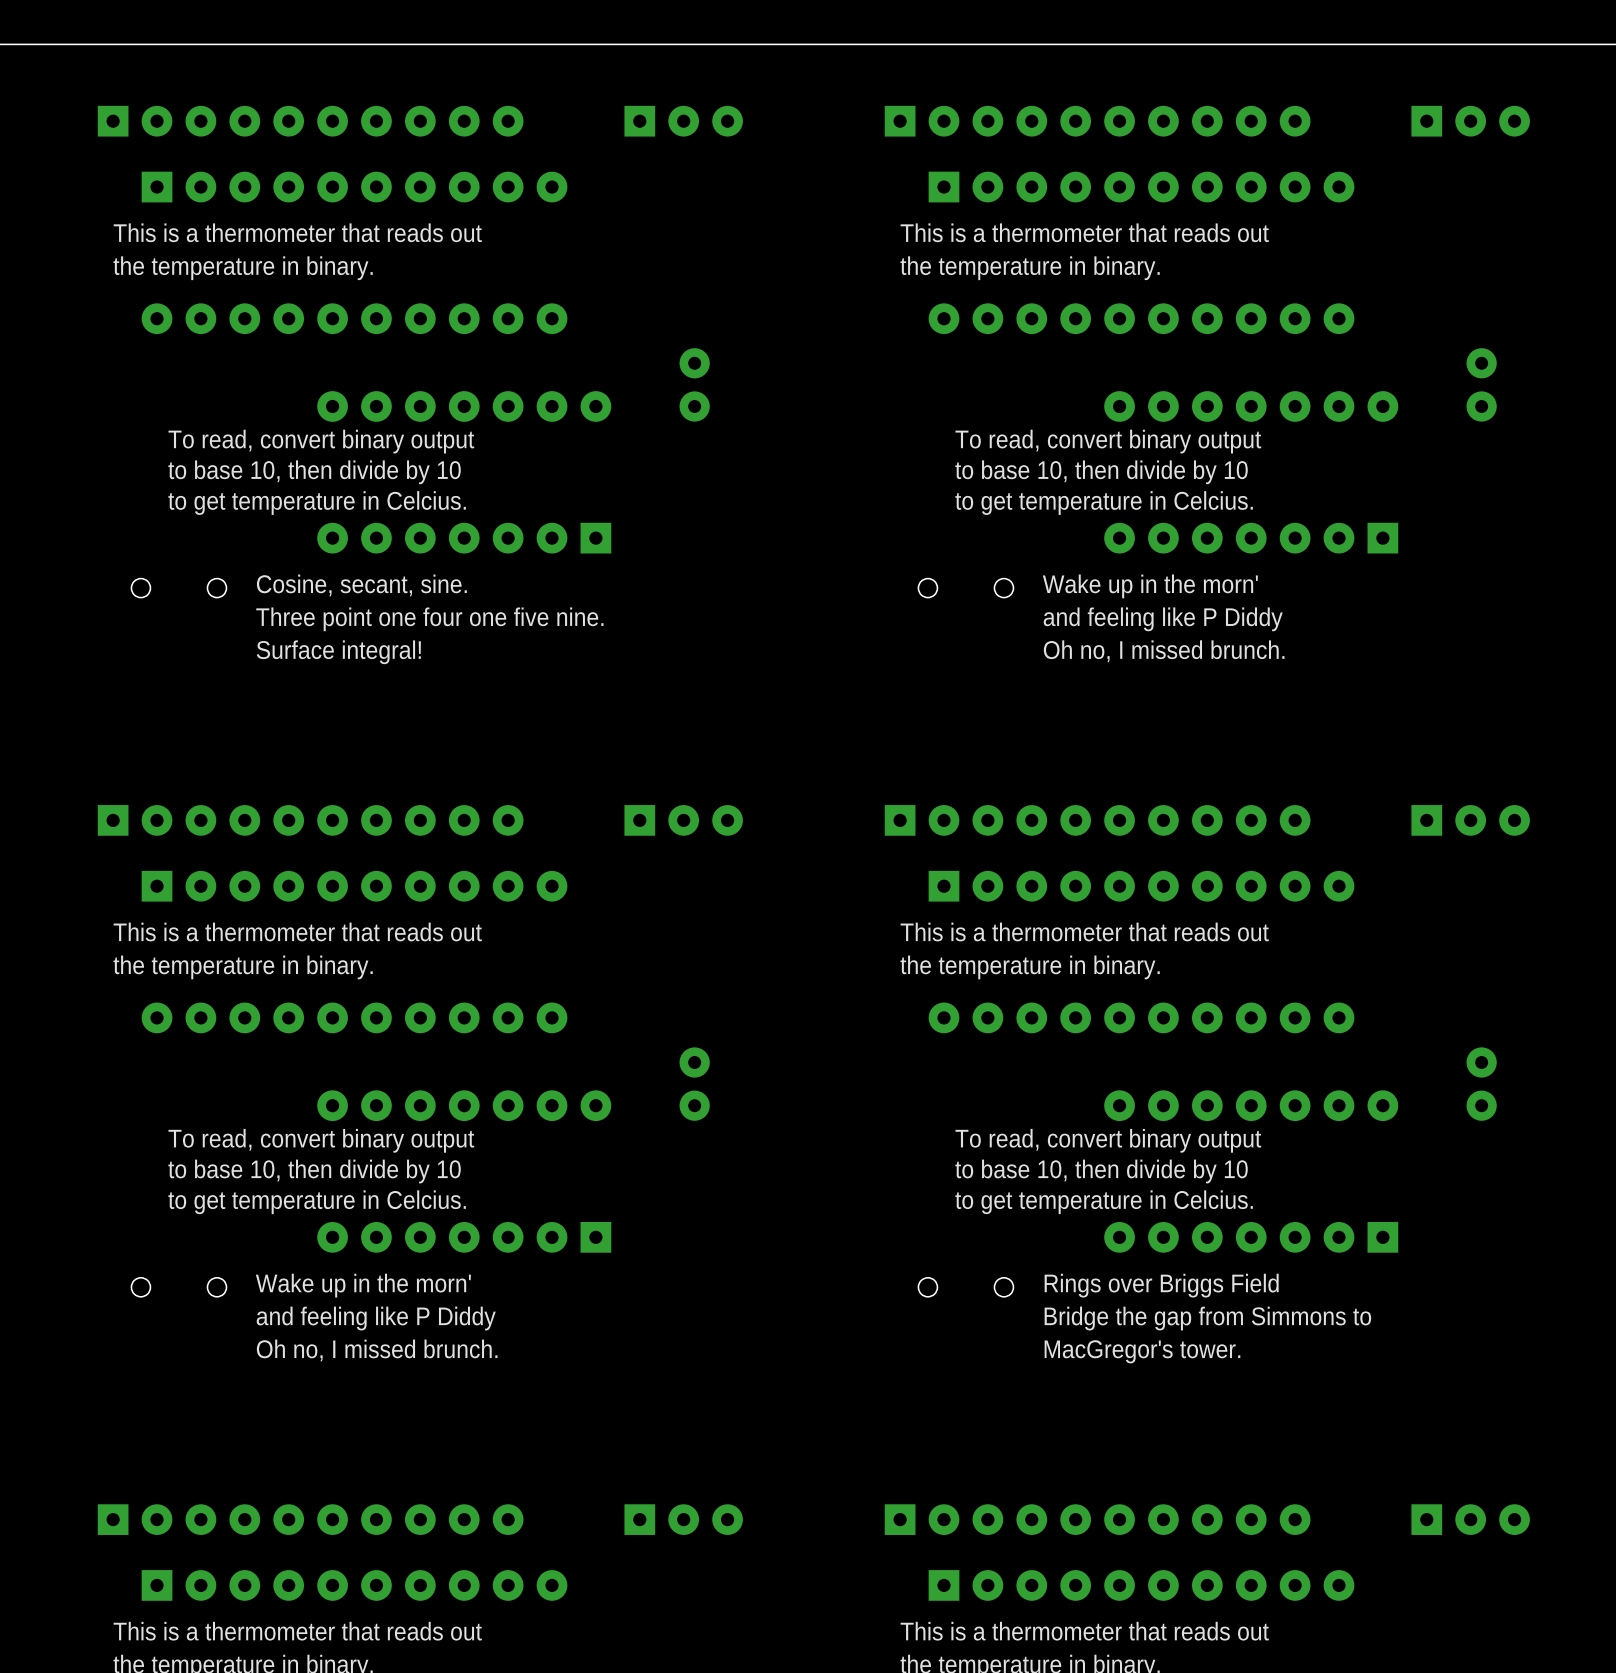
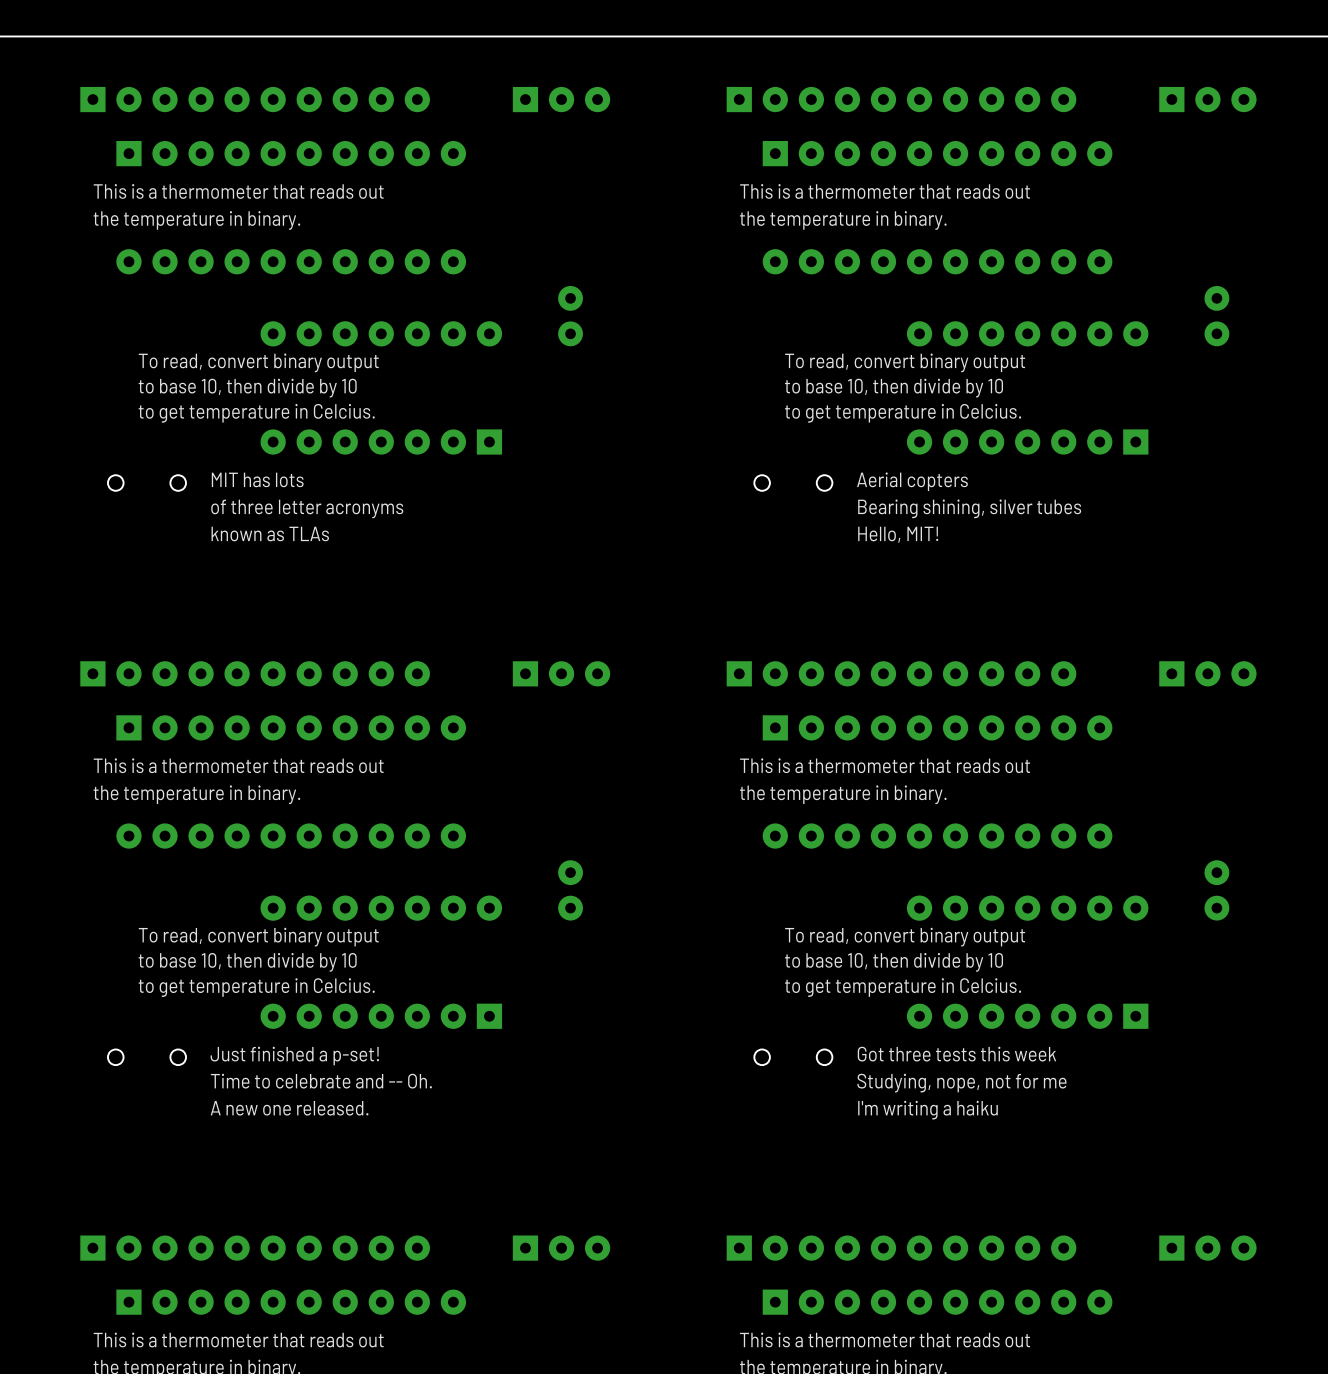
text: Cosine, secant, sine. (361, 585) -> MIT has lots (257, 479)
text: Wake up in the morn' (1150, 586) -> Aerial copters (912, 481)
text: Three point one four one five nine. (429, 619) -> of three letter acronyms (307, 508)
text: and feeling like P Diddy (1163, 619) -> Bearing shining, silver tubes (969, 508)
text: Oh no, I missed brunch. (1164, 651) -> Hello, MIT! (898, 534)
text: Surface integral! (338, 652) -> known as TLAs (270, 534)
text: Wake up in the morn' (363, 1285) -> Just finished a p-set! (294, 1056)
text: Rings over Briggs Field (1161, 1285) -> Got three tests this week (956, 1054)
text: and feeling like P Diddy (376, 1318) -> Time to celebrate and -- Oh. (321, 1081)
text: Bridge the gap from Simmons to (1207, 1318) -> Studying, nope, not for me (961, 1083)
text: Oh no, I missed brunch. (377, 1350) -> A new one released. (289, 1108)
text: MacGregor's tower. (1142, 1351) -> I'm writing a haiku (927, 1110)

